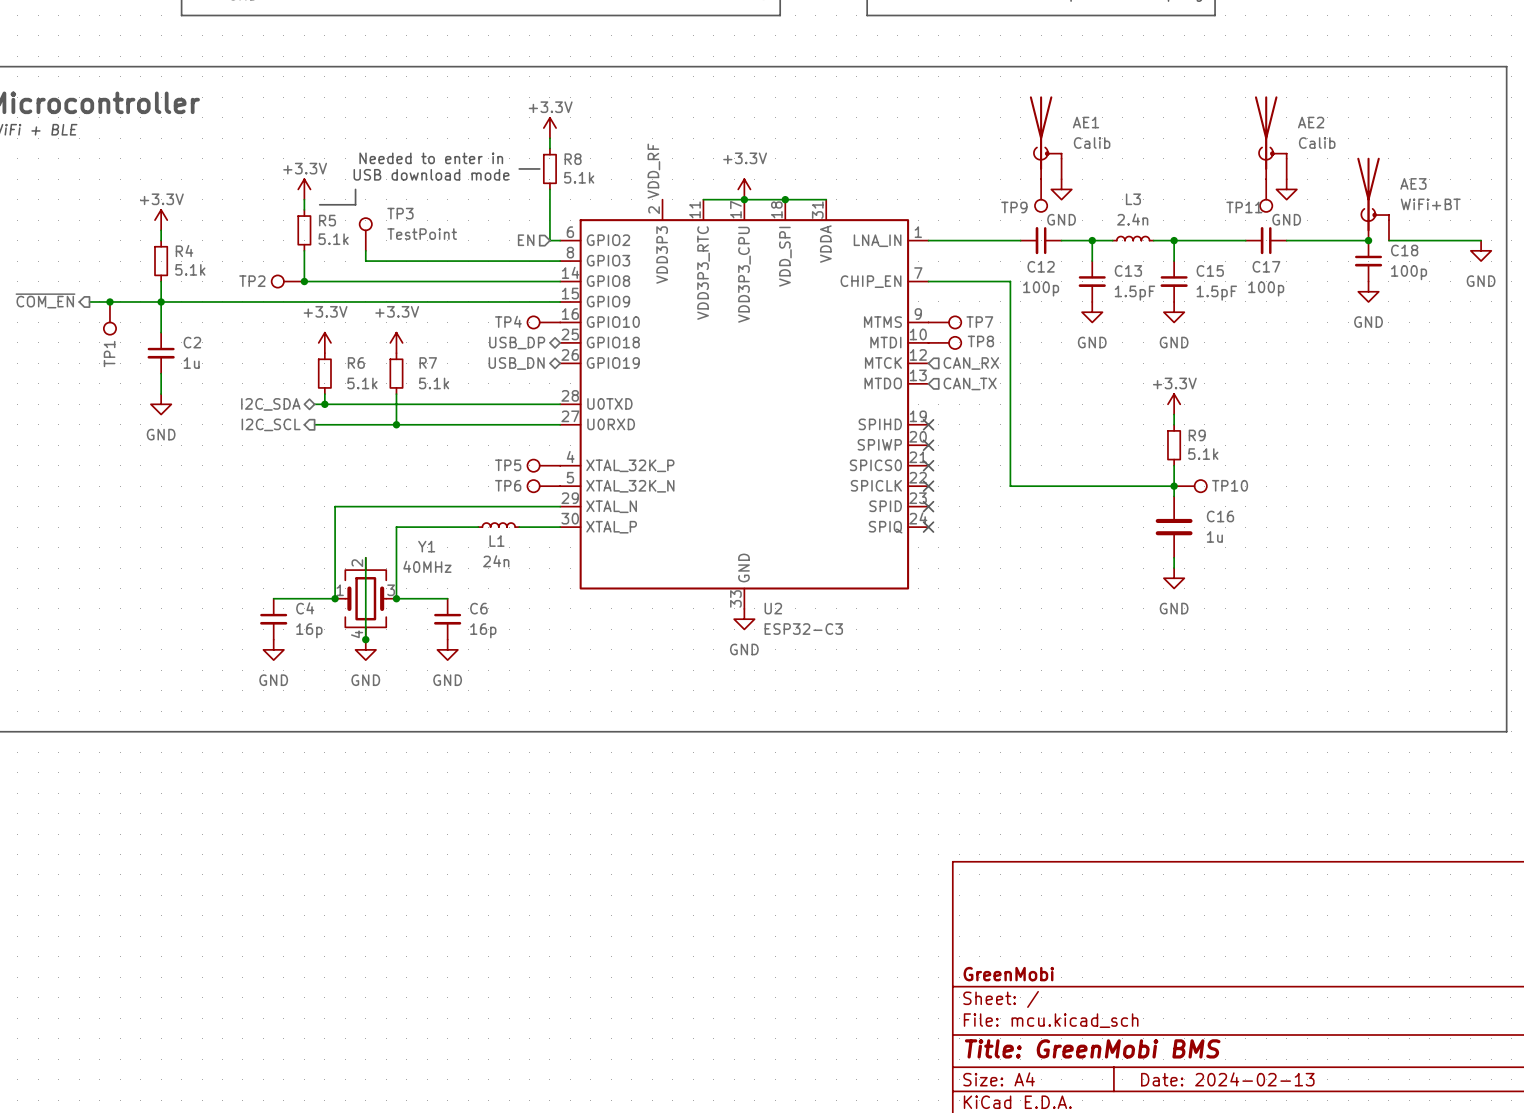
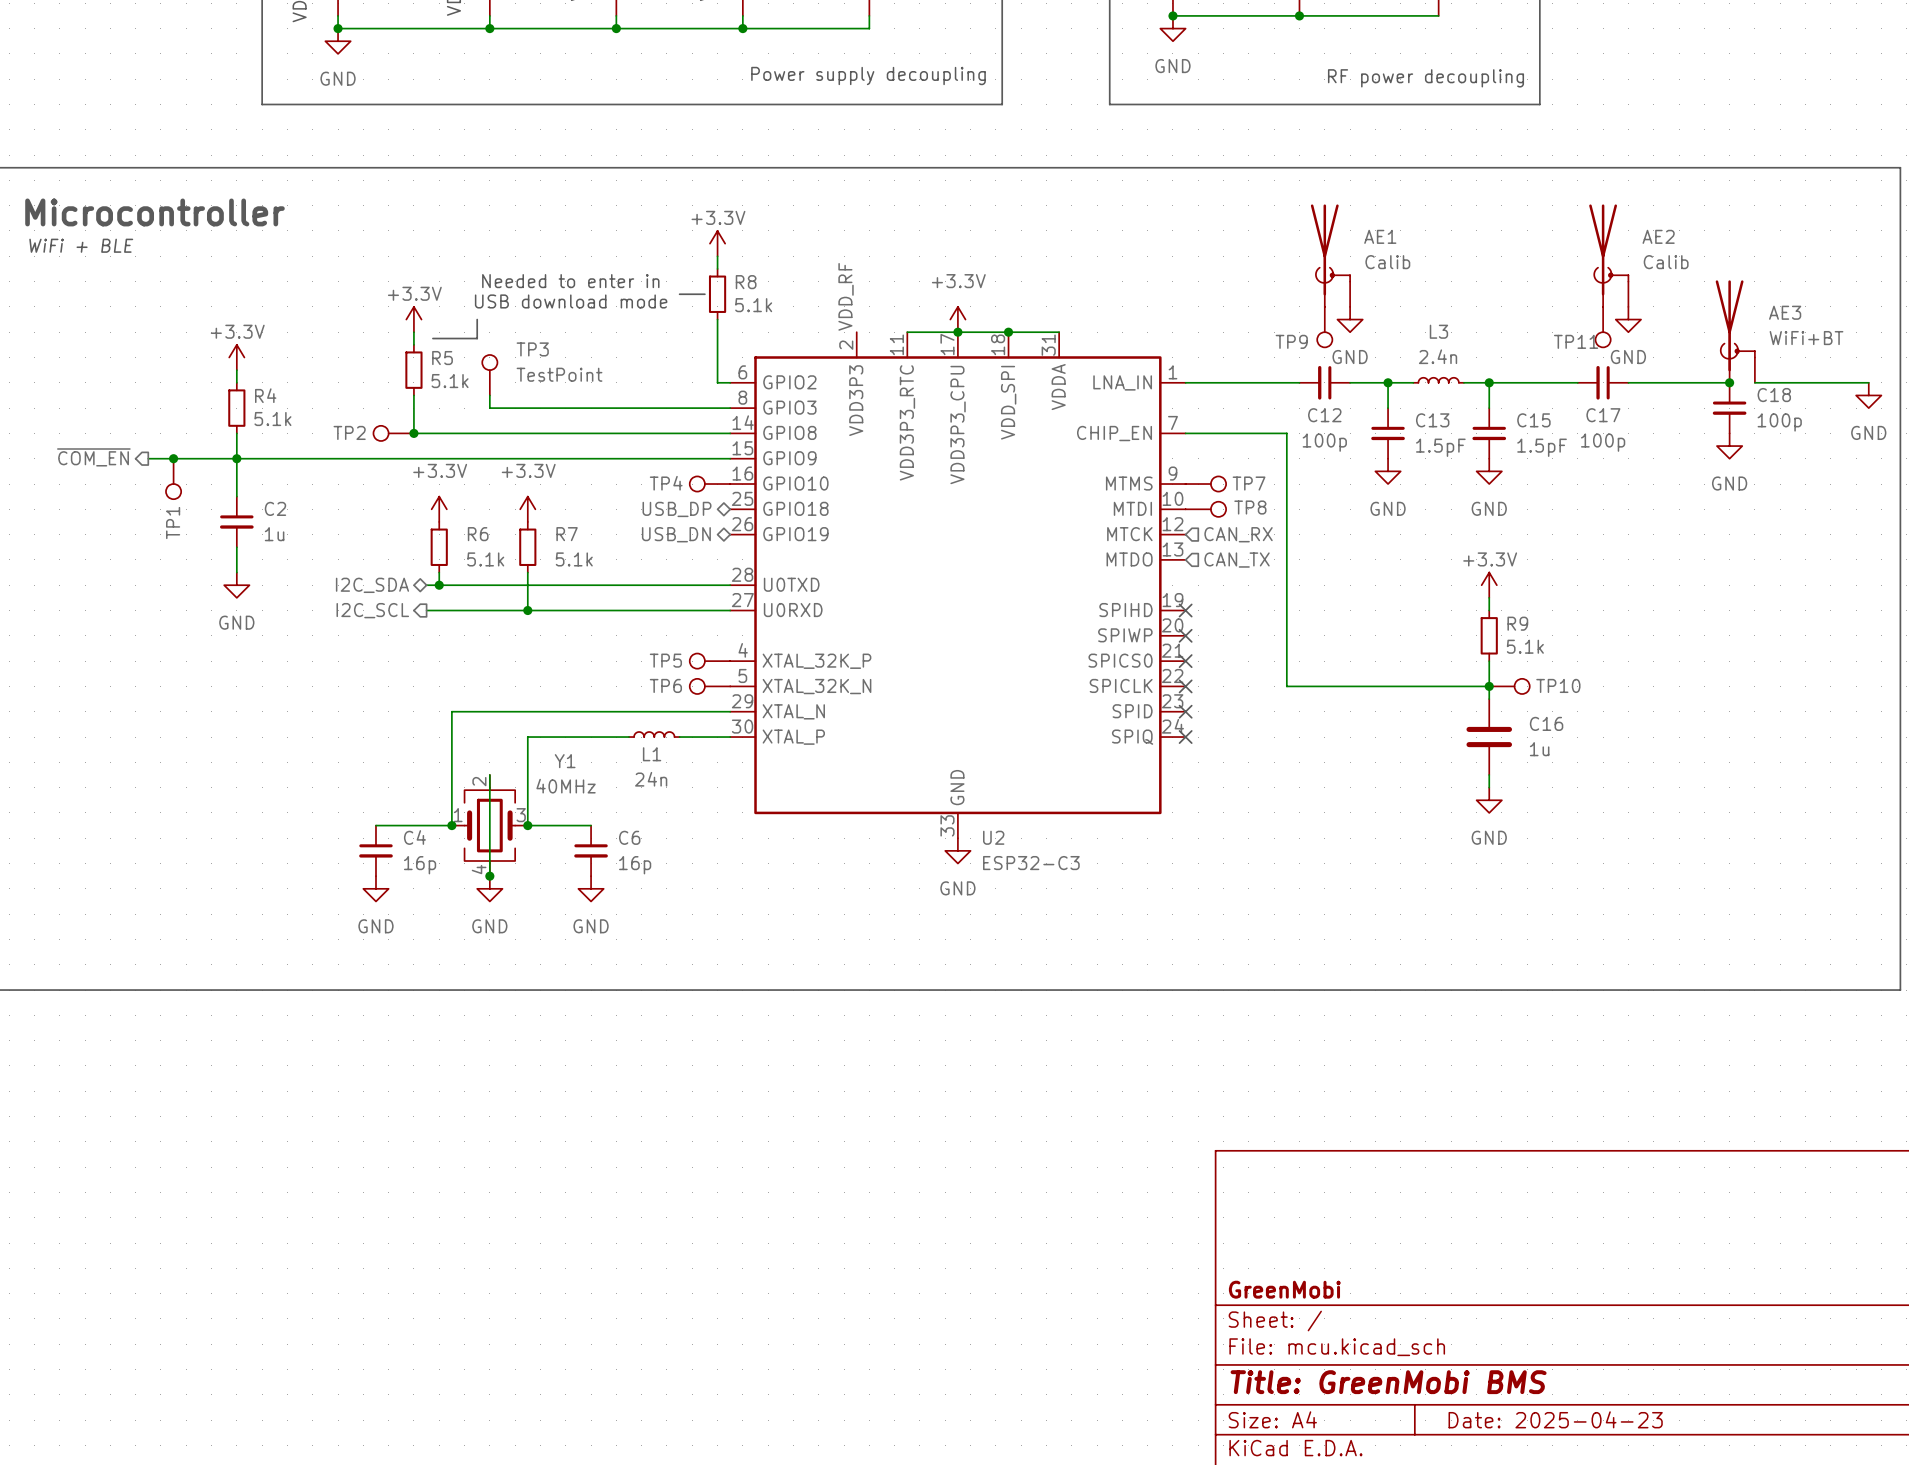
hierarchical label: EN (526, 240) -> none
title block: Date: 2024-02-13 (1227, 1079) -> Date: 2025-04-23 (1555, 1419)

